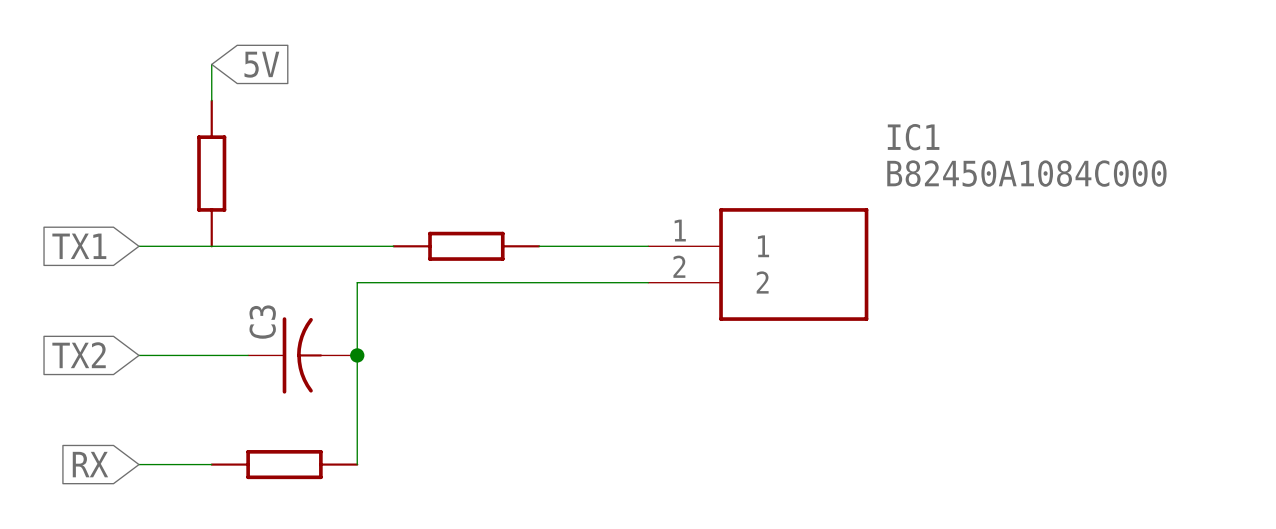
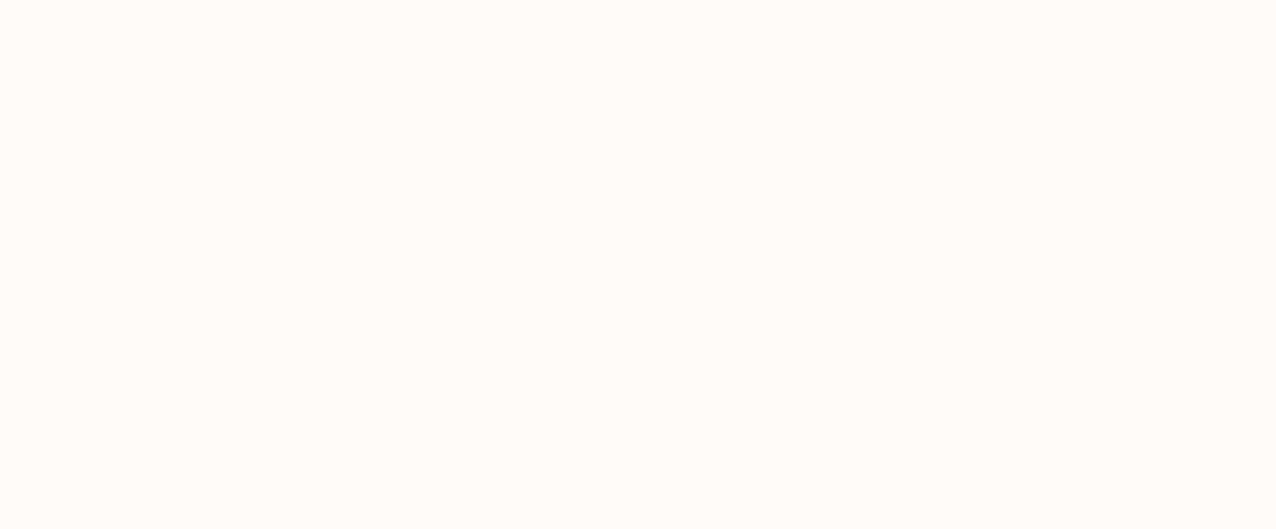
wire: (211, 64) (211, 100) -> none
global label: 5V (261, 64) -> none
part: (211, 173) -> none
global label: TX1 (79, 246) -> none
wire: (138, 246) (393, 246) -> none
part: (466, 246) -> none
wire: (539, 246) (648, 246) -> none
IC1: B82450A1084C000 (758, 264) -> none
wire: (648, 282) (357, 282) (357, 464) -> none
global label: TX2 (79, 355) -> none
wire: (138, 355) (248, 355) -> none
C3: (302, 355) -> none
junction: (357, 355) -> none
global label: RX (90, 464) -> none
wire: (138, 464) (211, 464) -> none
part: (284, 464) -> none

